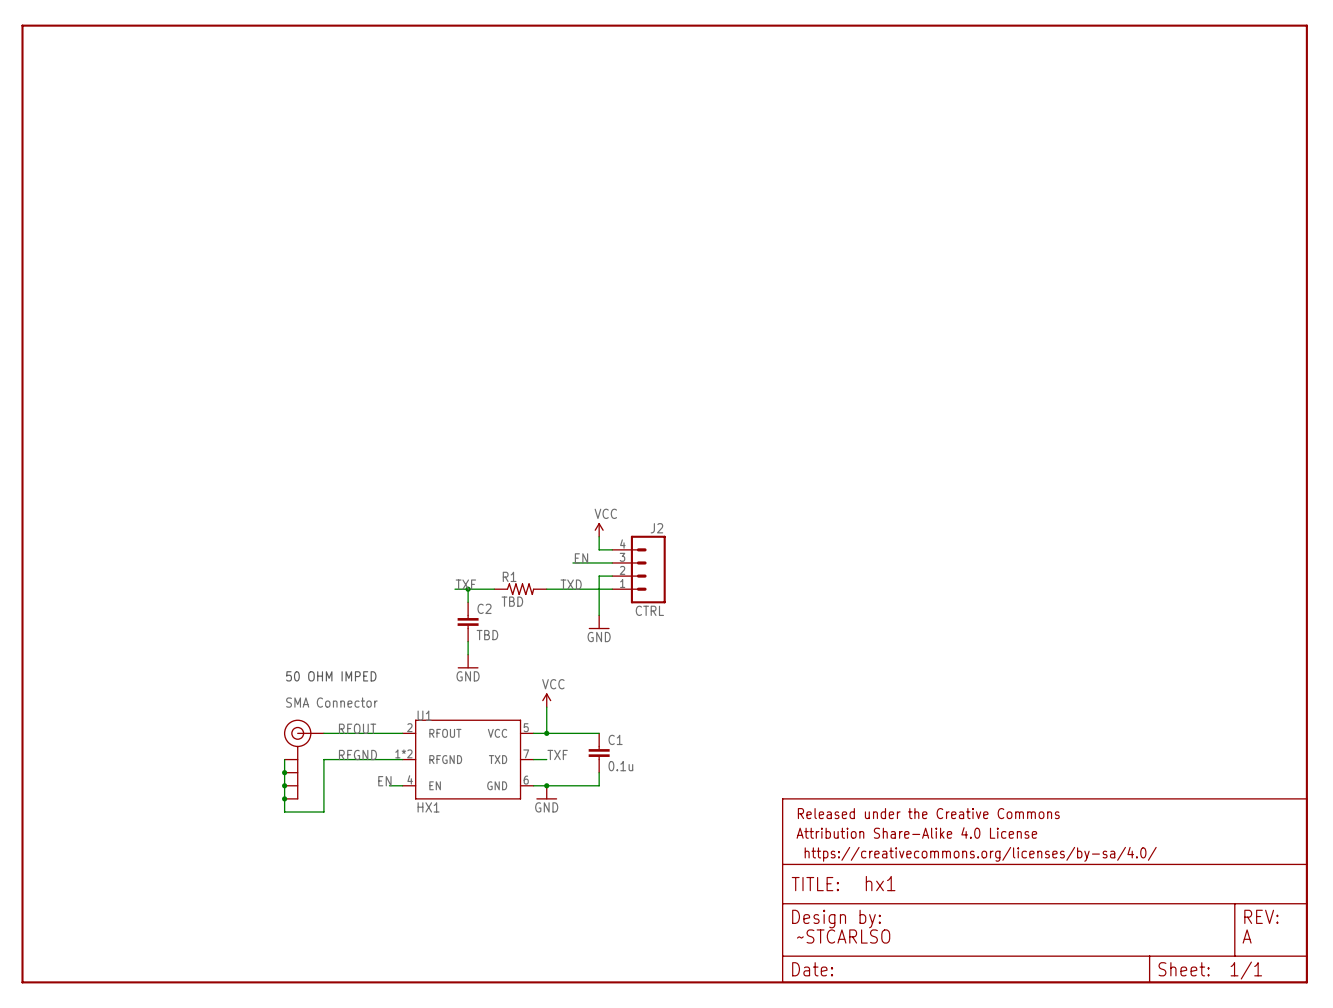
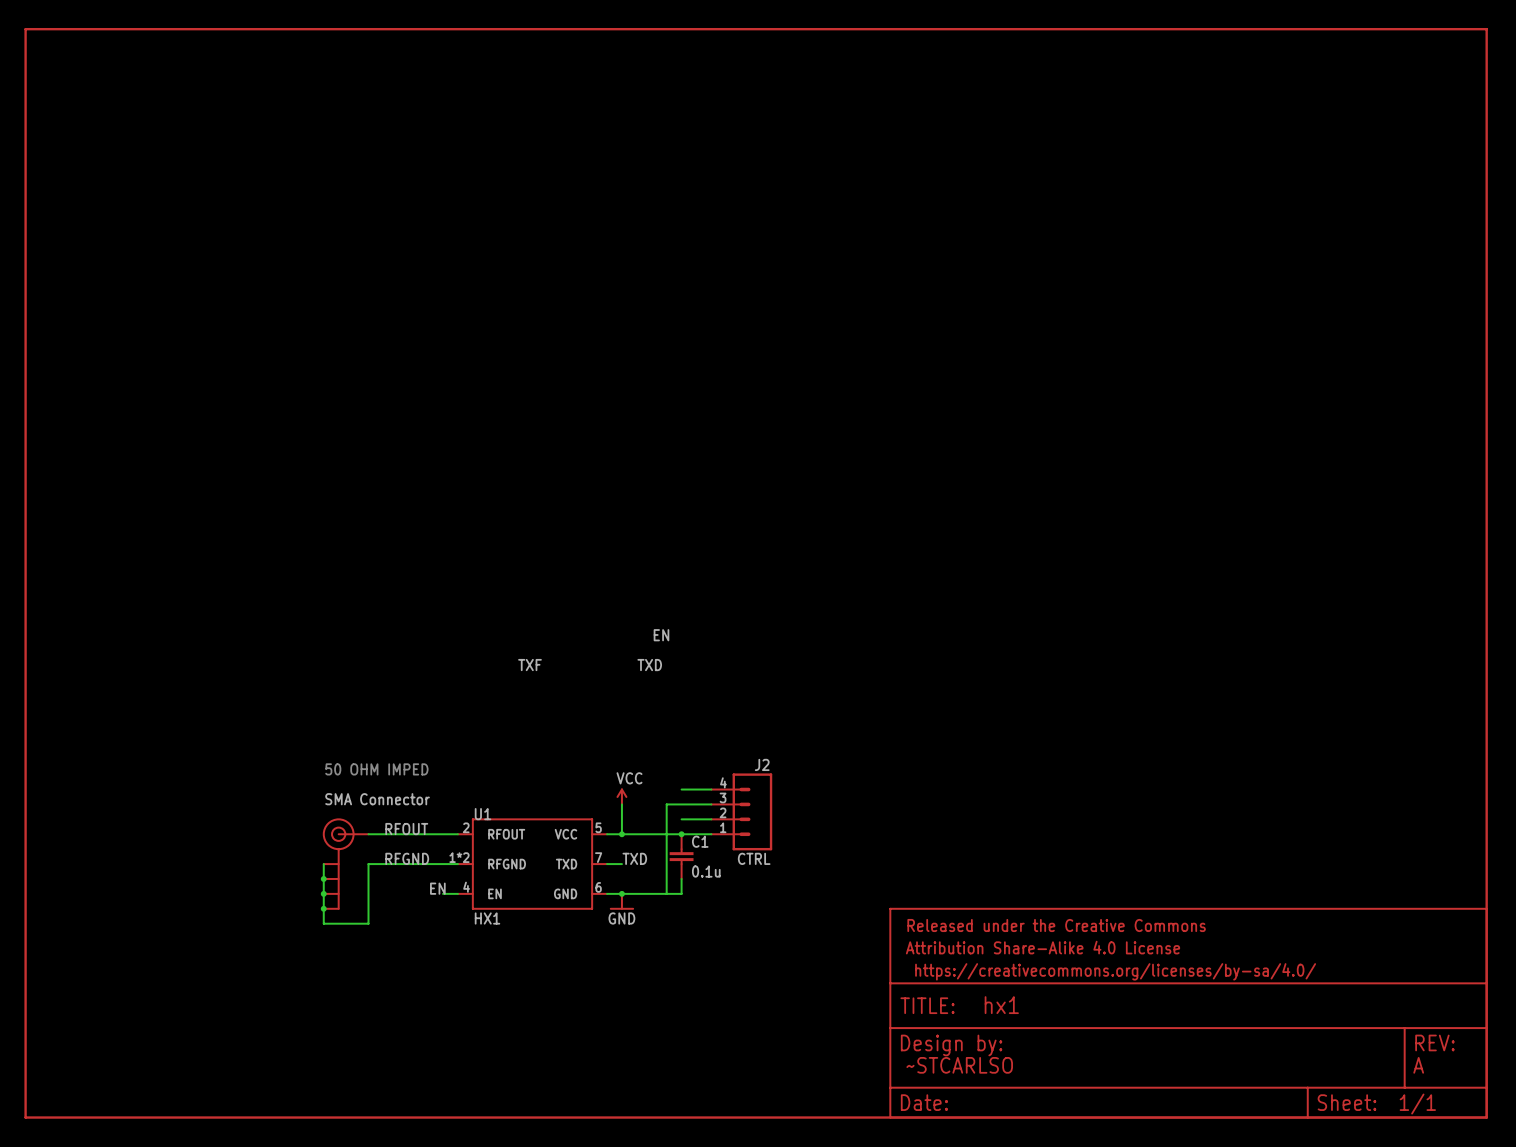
power symbol: VCC (599, 529) -> none
wire: (599, 536) (599, 549) (612, 549) -> none
wire: (572, 562) (612, 562) -> none
J2 position: (639, 569) -> (741, 811)
wire: (612, 576) (599, 576) (599, 615) -> none
wire: (454, 589) (494, 589) -> none
wire: (468, 589) (468, 602) -> none
junction: (468, 589) -> none
R1: TBD (520, 589) -> none
wire: (546, 589) (612, 589) -> none
C2: TBD (468, 621) -> none
power symbol: GND (599, 622) -> none
wire: (468, 641) (468, 654) -> none
power symbol: GND (468, 661) -> none
wire: none -> (681, 789) (711, 789)
wire: none -> (711, 804) (666, 804) (666, 893)
wire: none -> (681, 819) (711, 819)
wire: none -> (681, 834) (711, 834)
junction: none -> (681, 834)
label: TXF (557, 754) -> TXD (634, 858)

